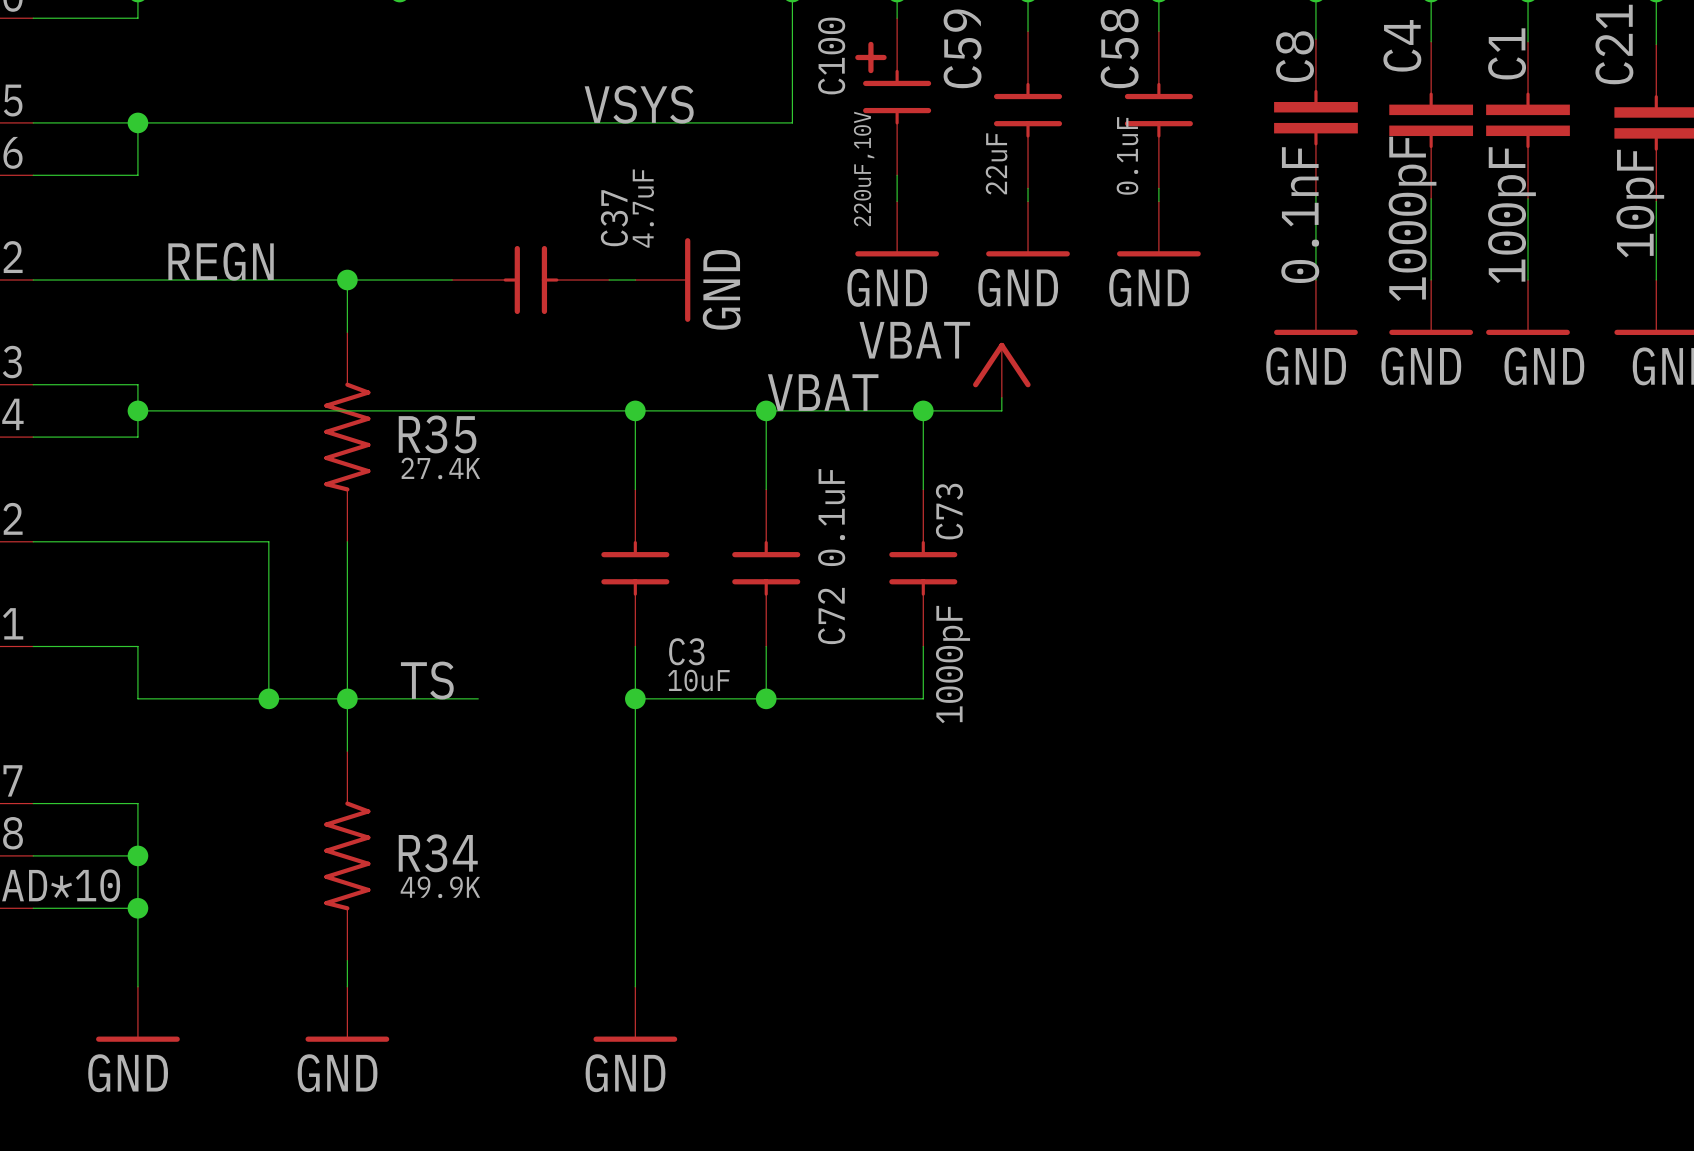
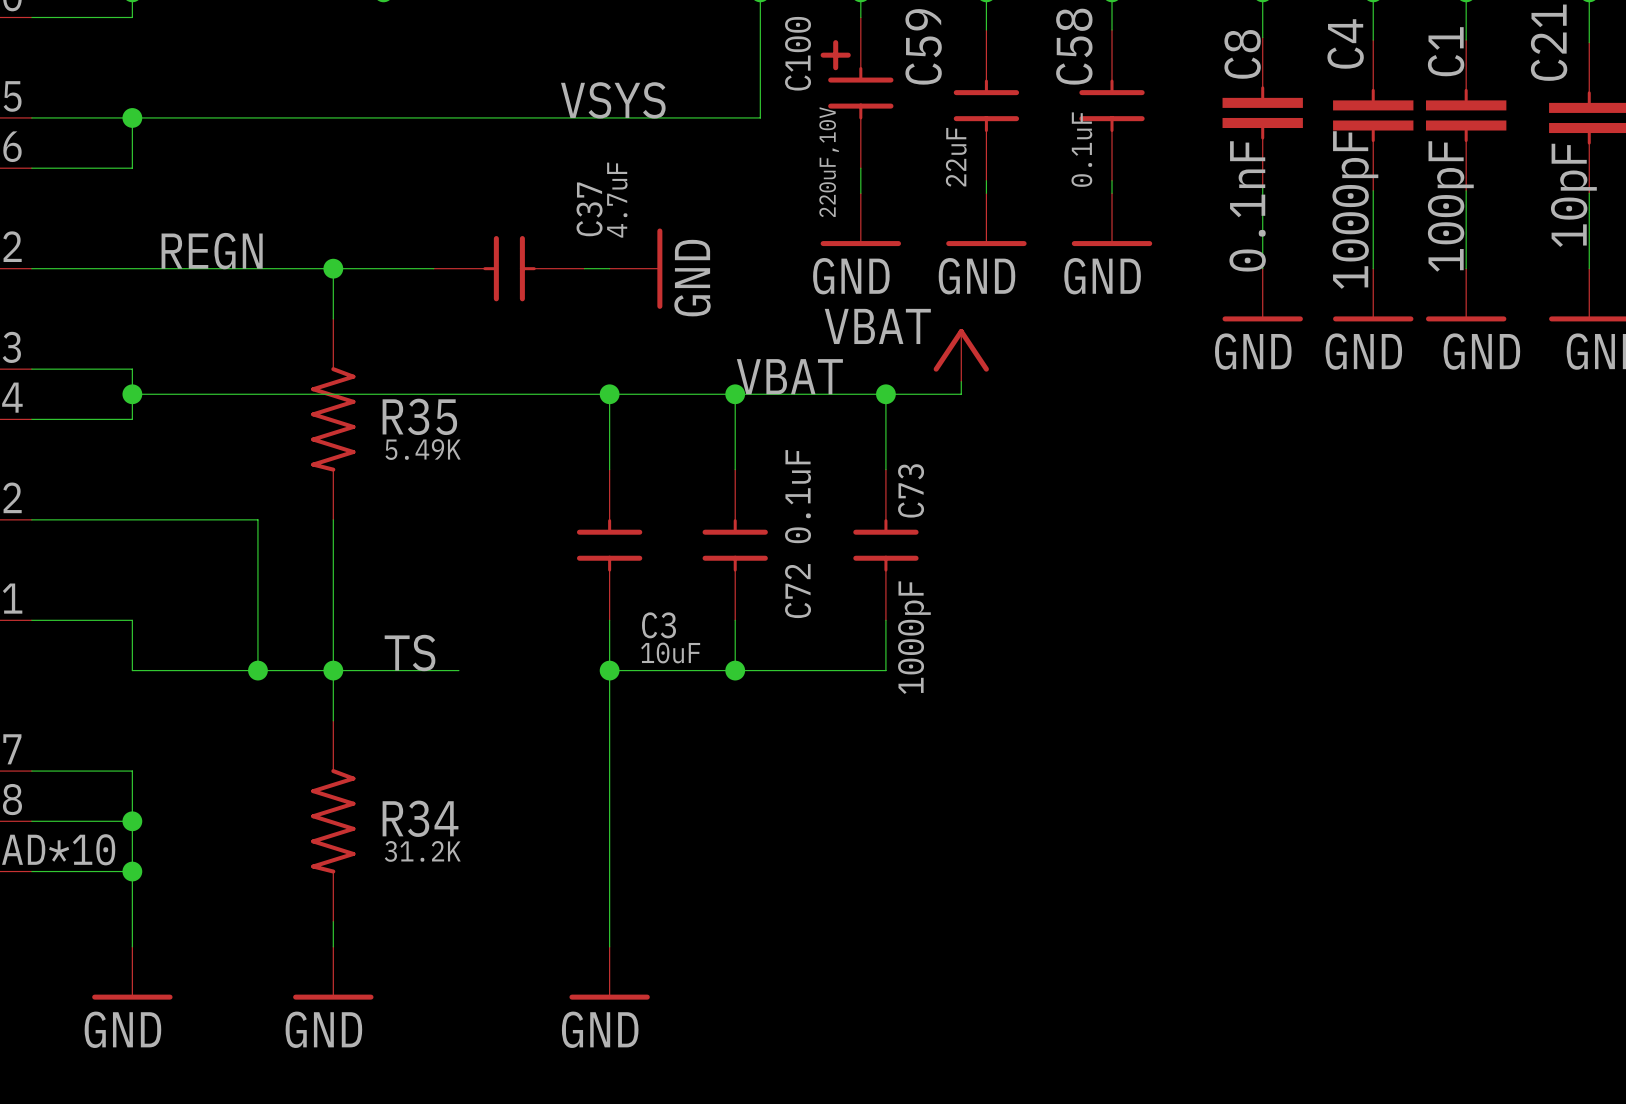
R35 value: 27.4K (440, 468) -> 5.49K (423, 449)
R34 value: 49.9K (440, 887) -> 31.2K (422, 851)

